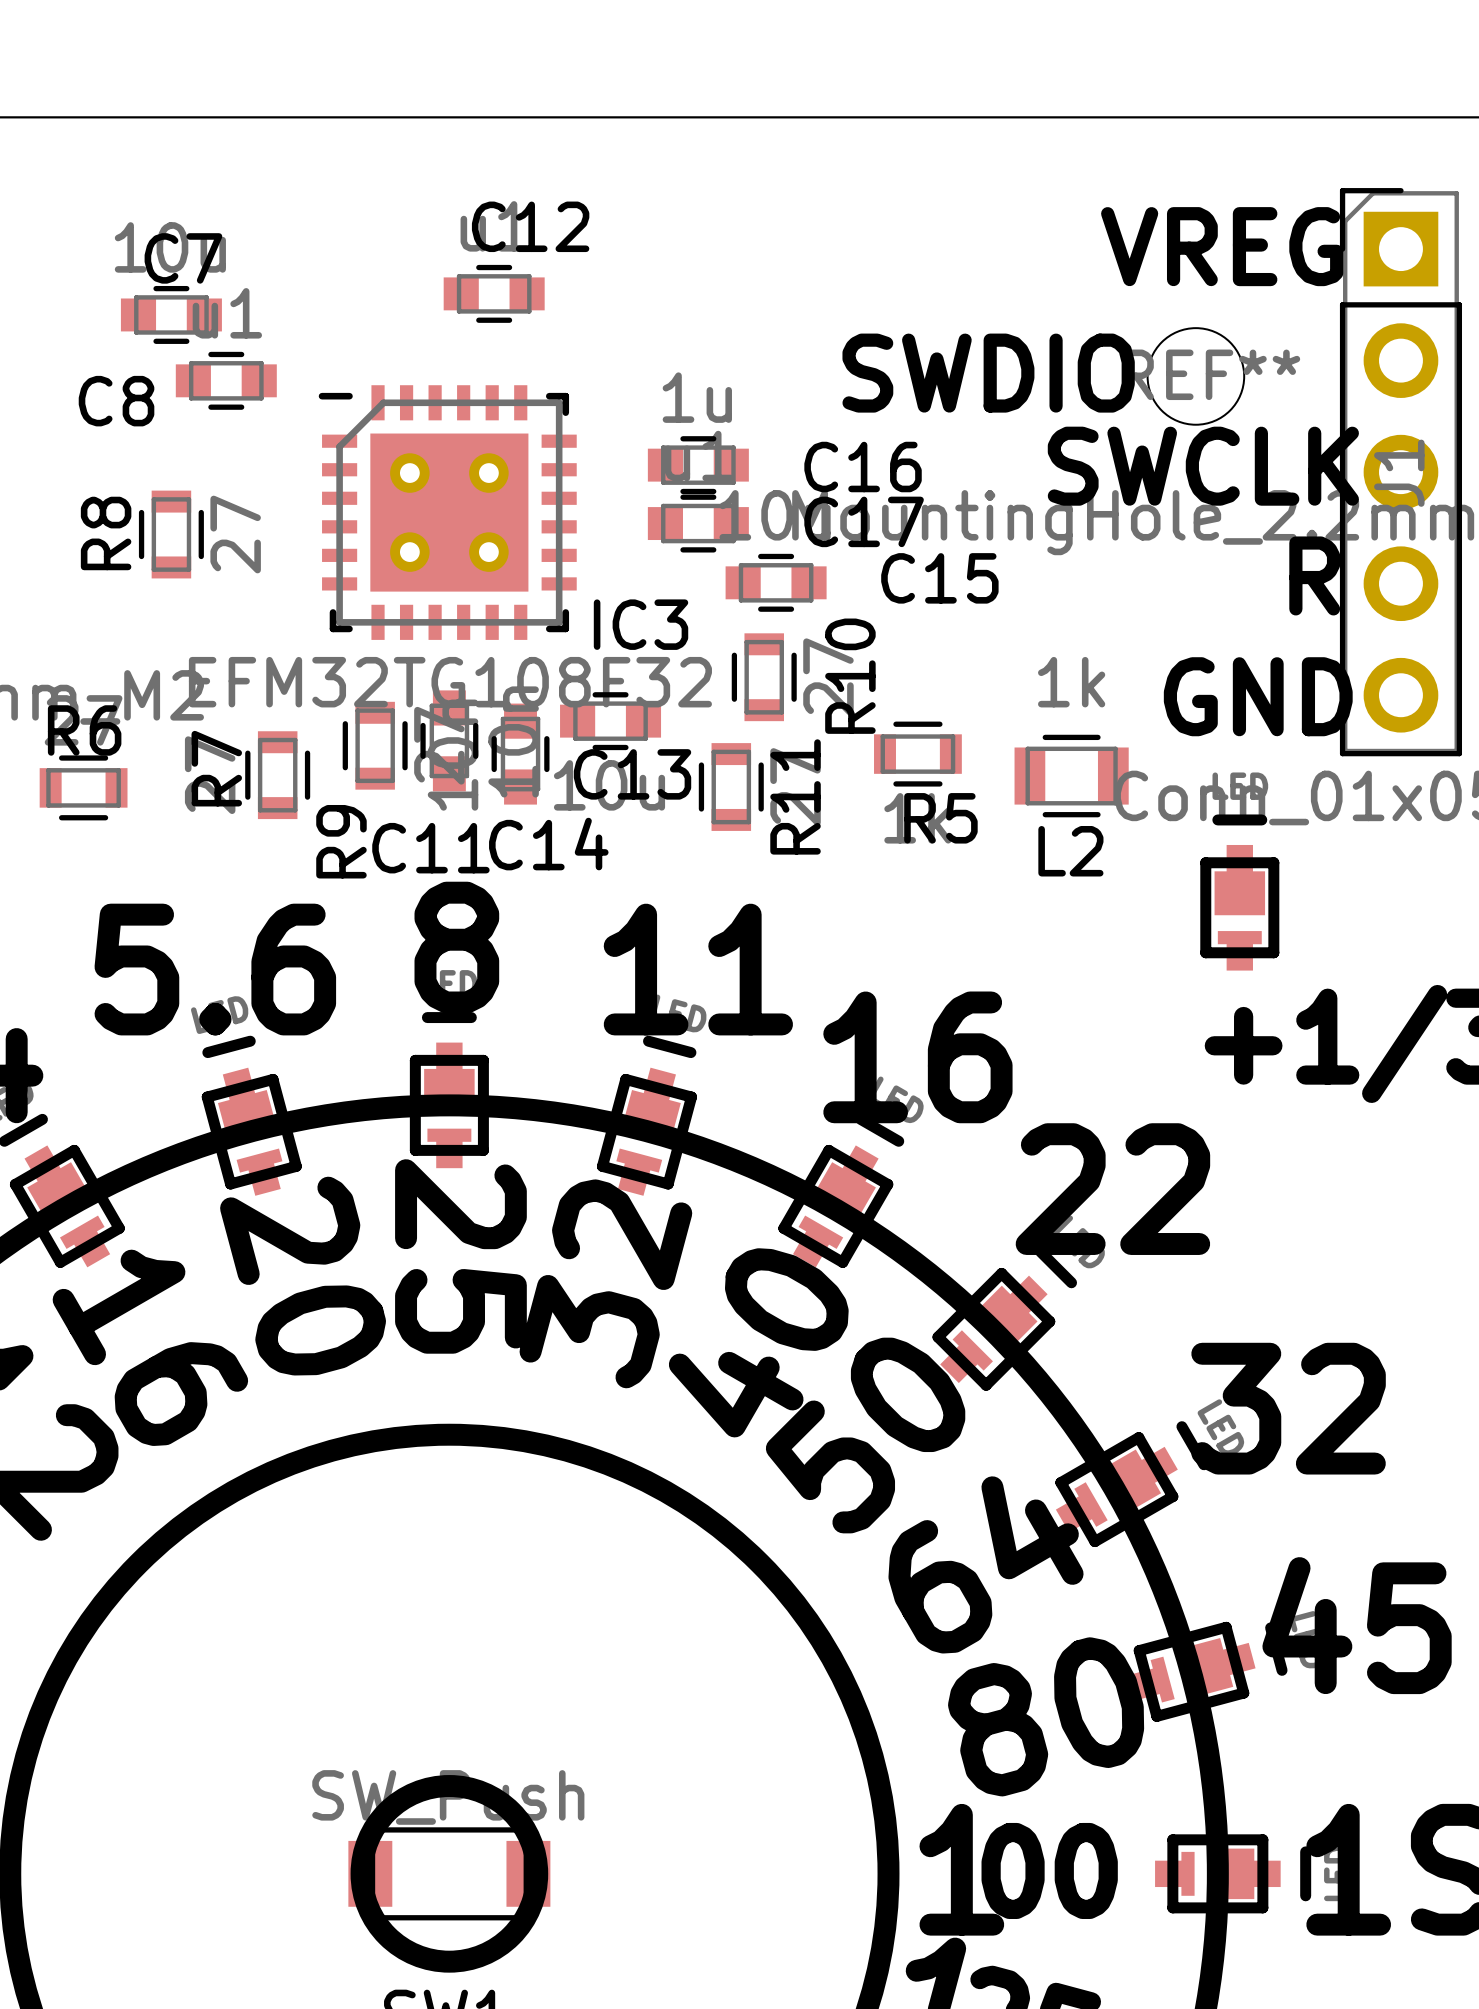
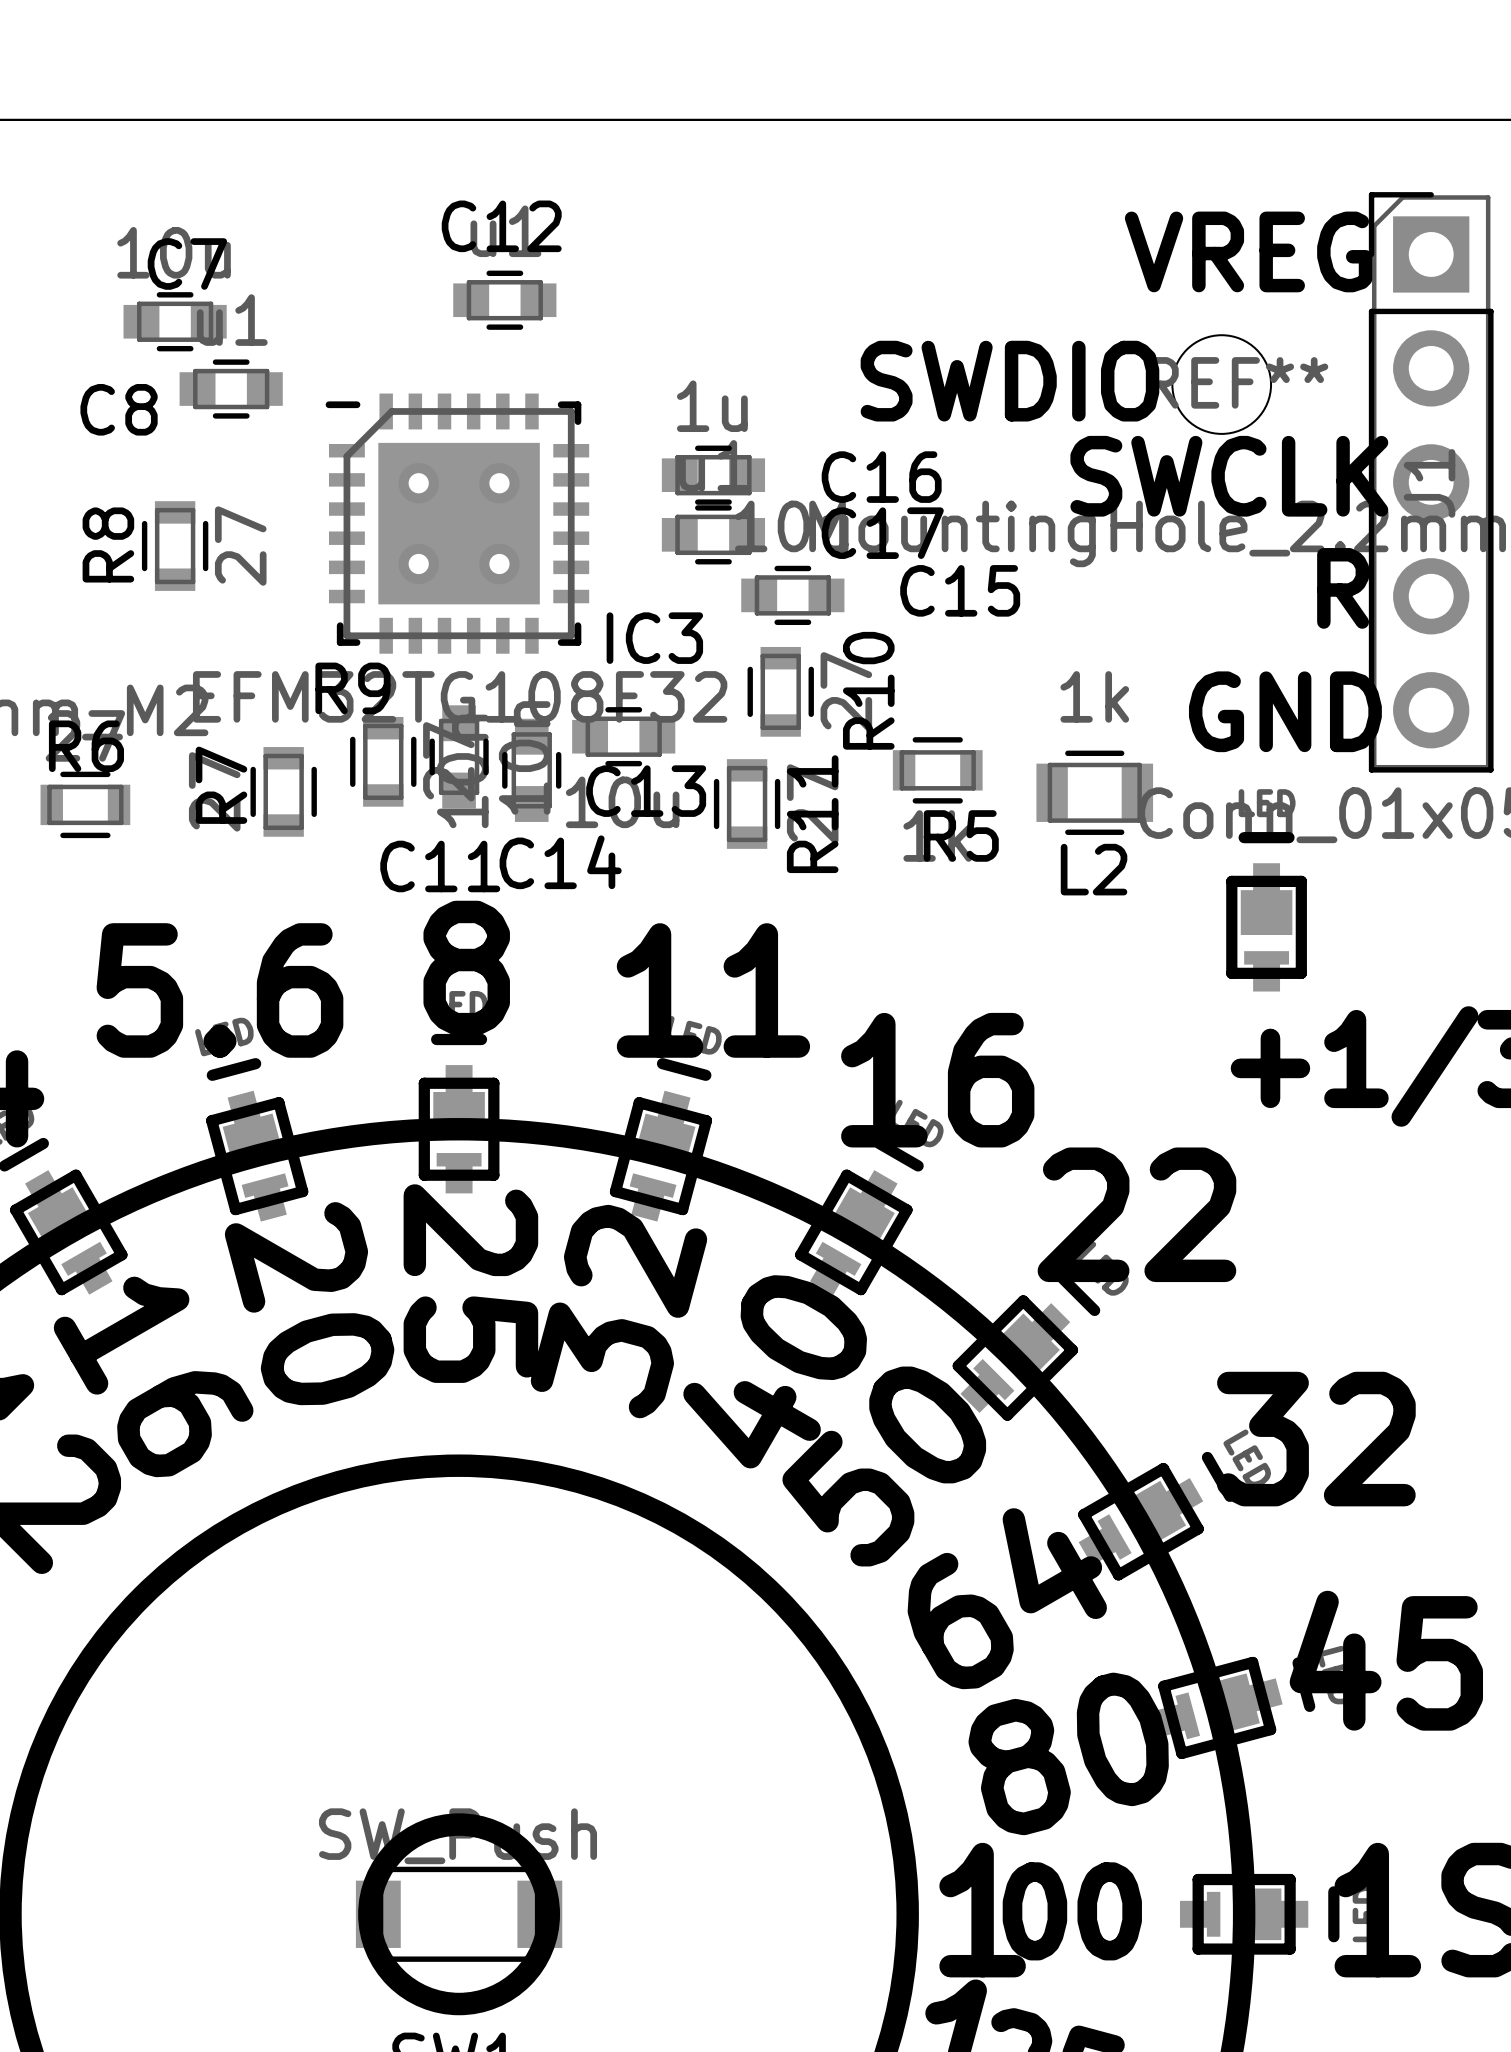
C12 name position: C12 (530, 226) -> C12 (501, 226)
R9 name rotation: 0° (341, 841) -> 90° clockwise (352, 688)
R9 name position: R9 (341, 841) -> R9 (352, 688)

